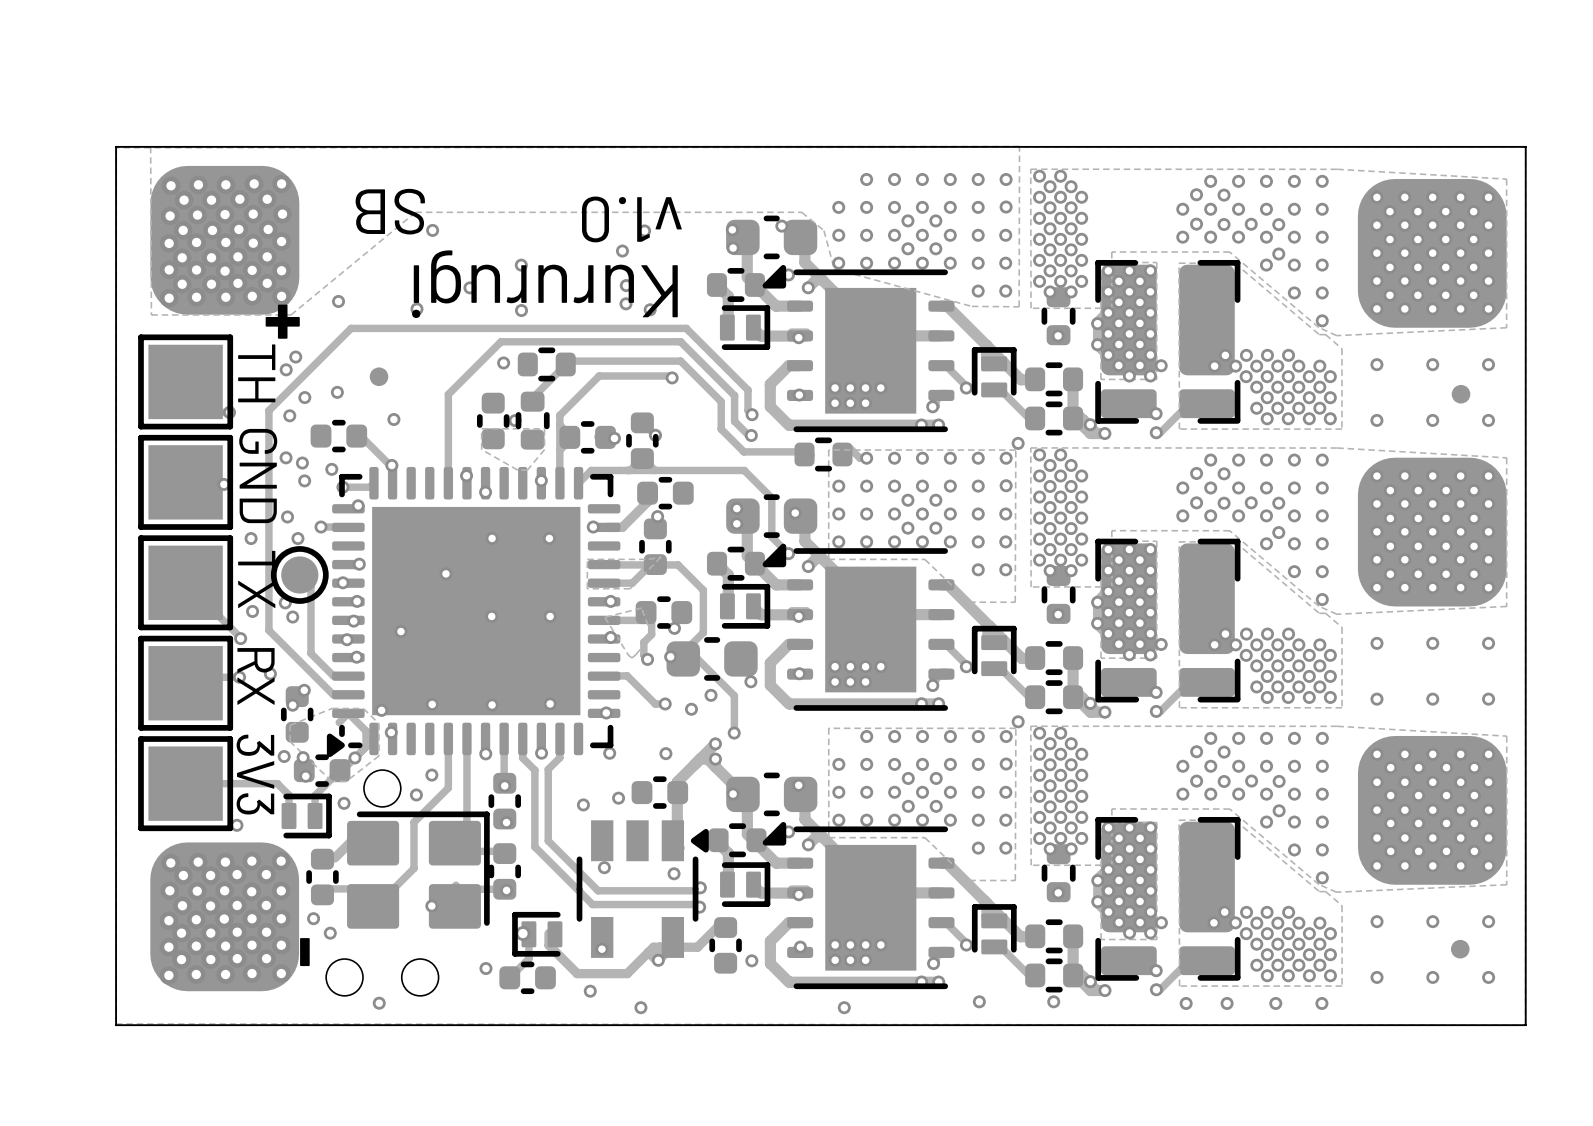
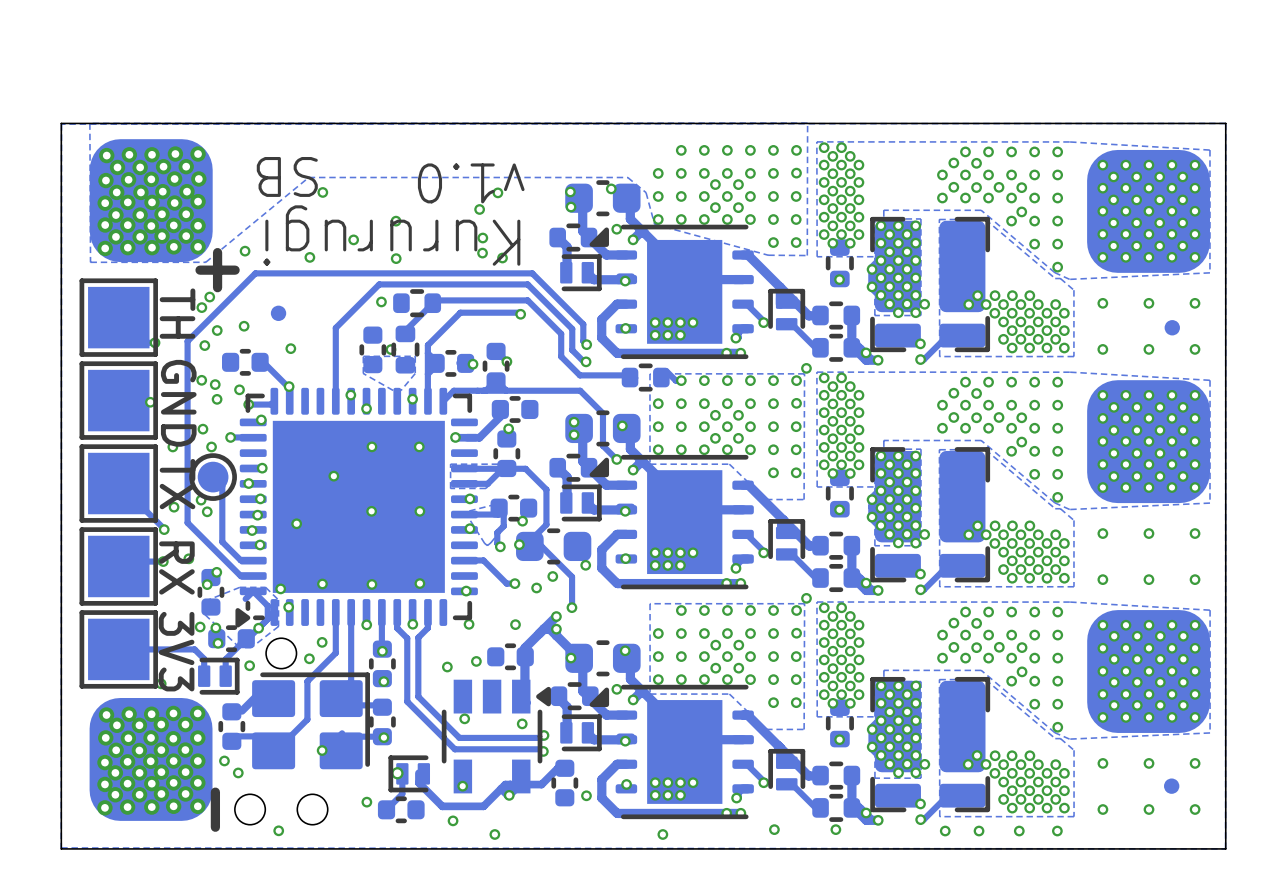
part footprint: [762, 264, 955, 433] -> [589, 224, 754, 360]
part footprint: [762, 543, 955, 711] -> [589, 454, 754, 590]
part footprint: [762, 821, 955, 990] -> [589, 684, 754, 820]

